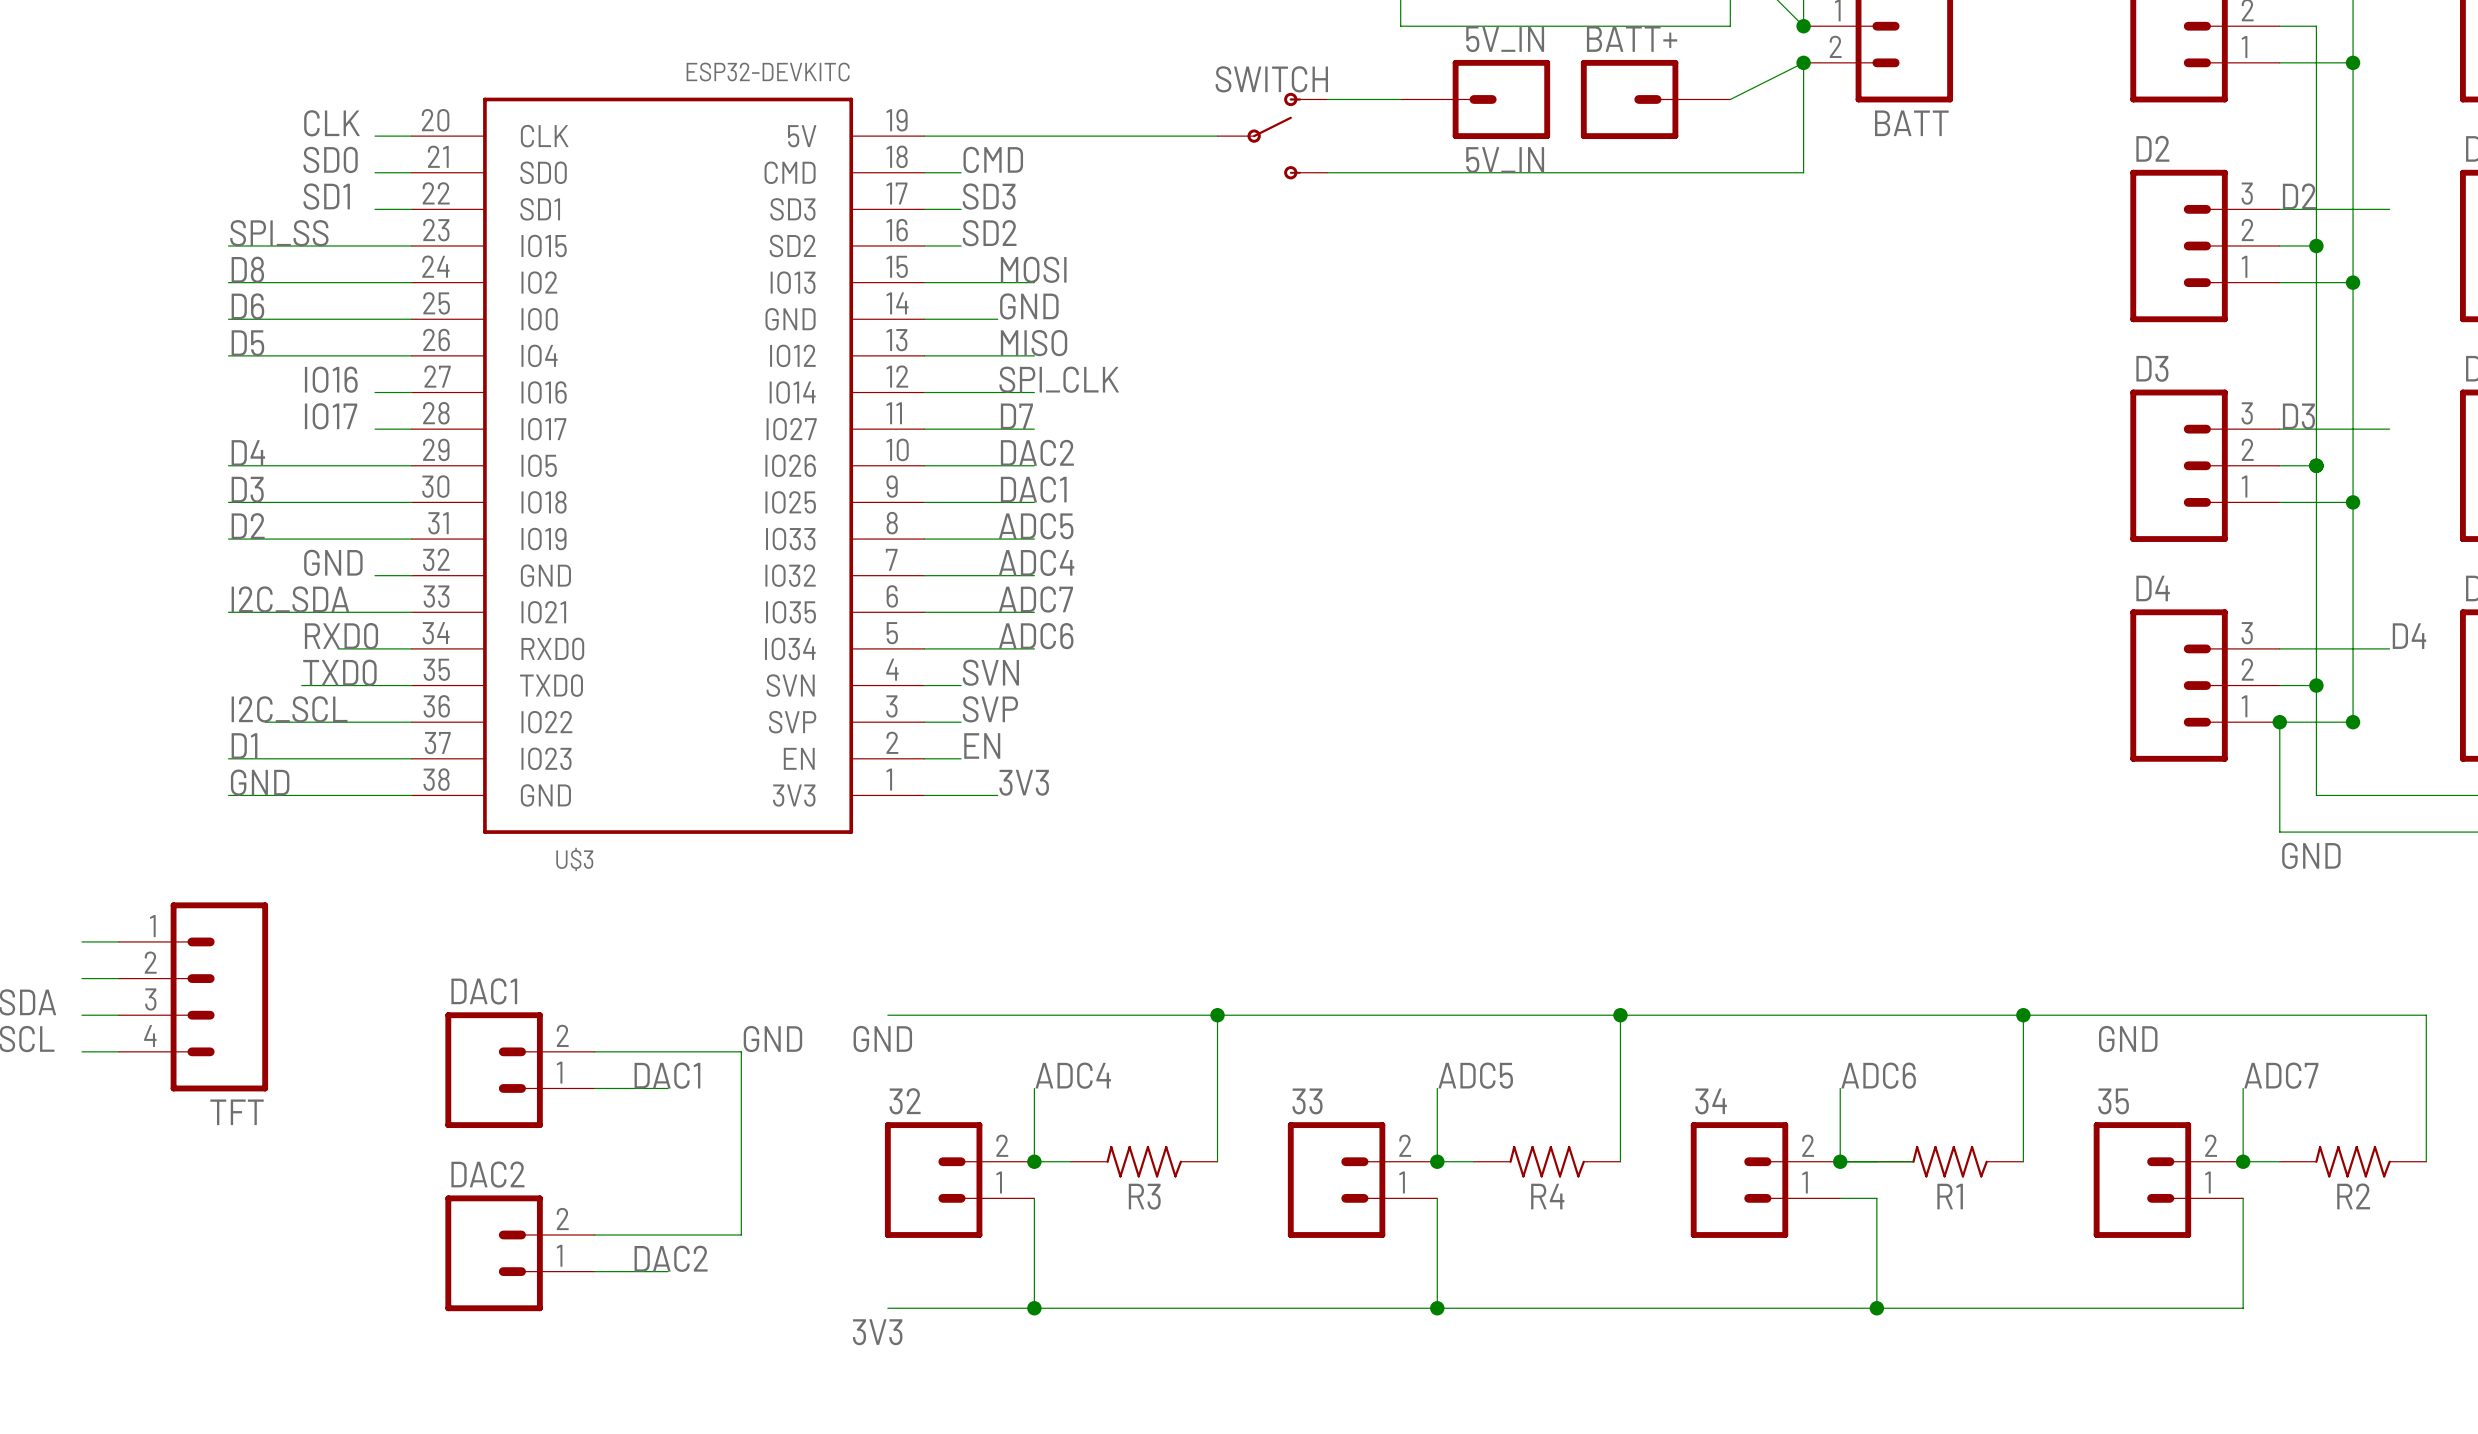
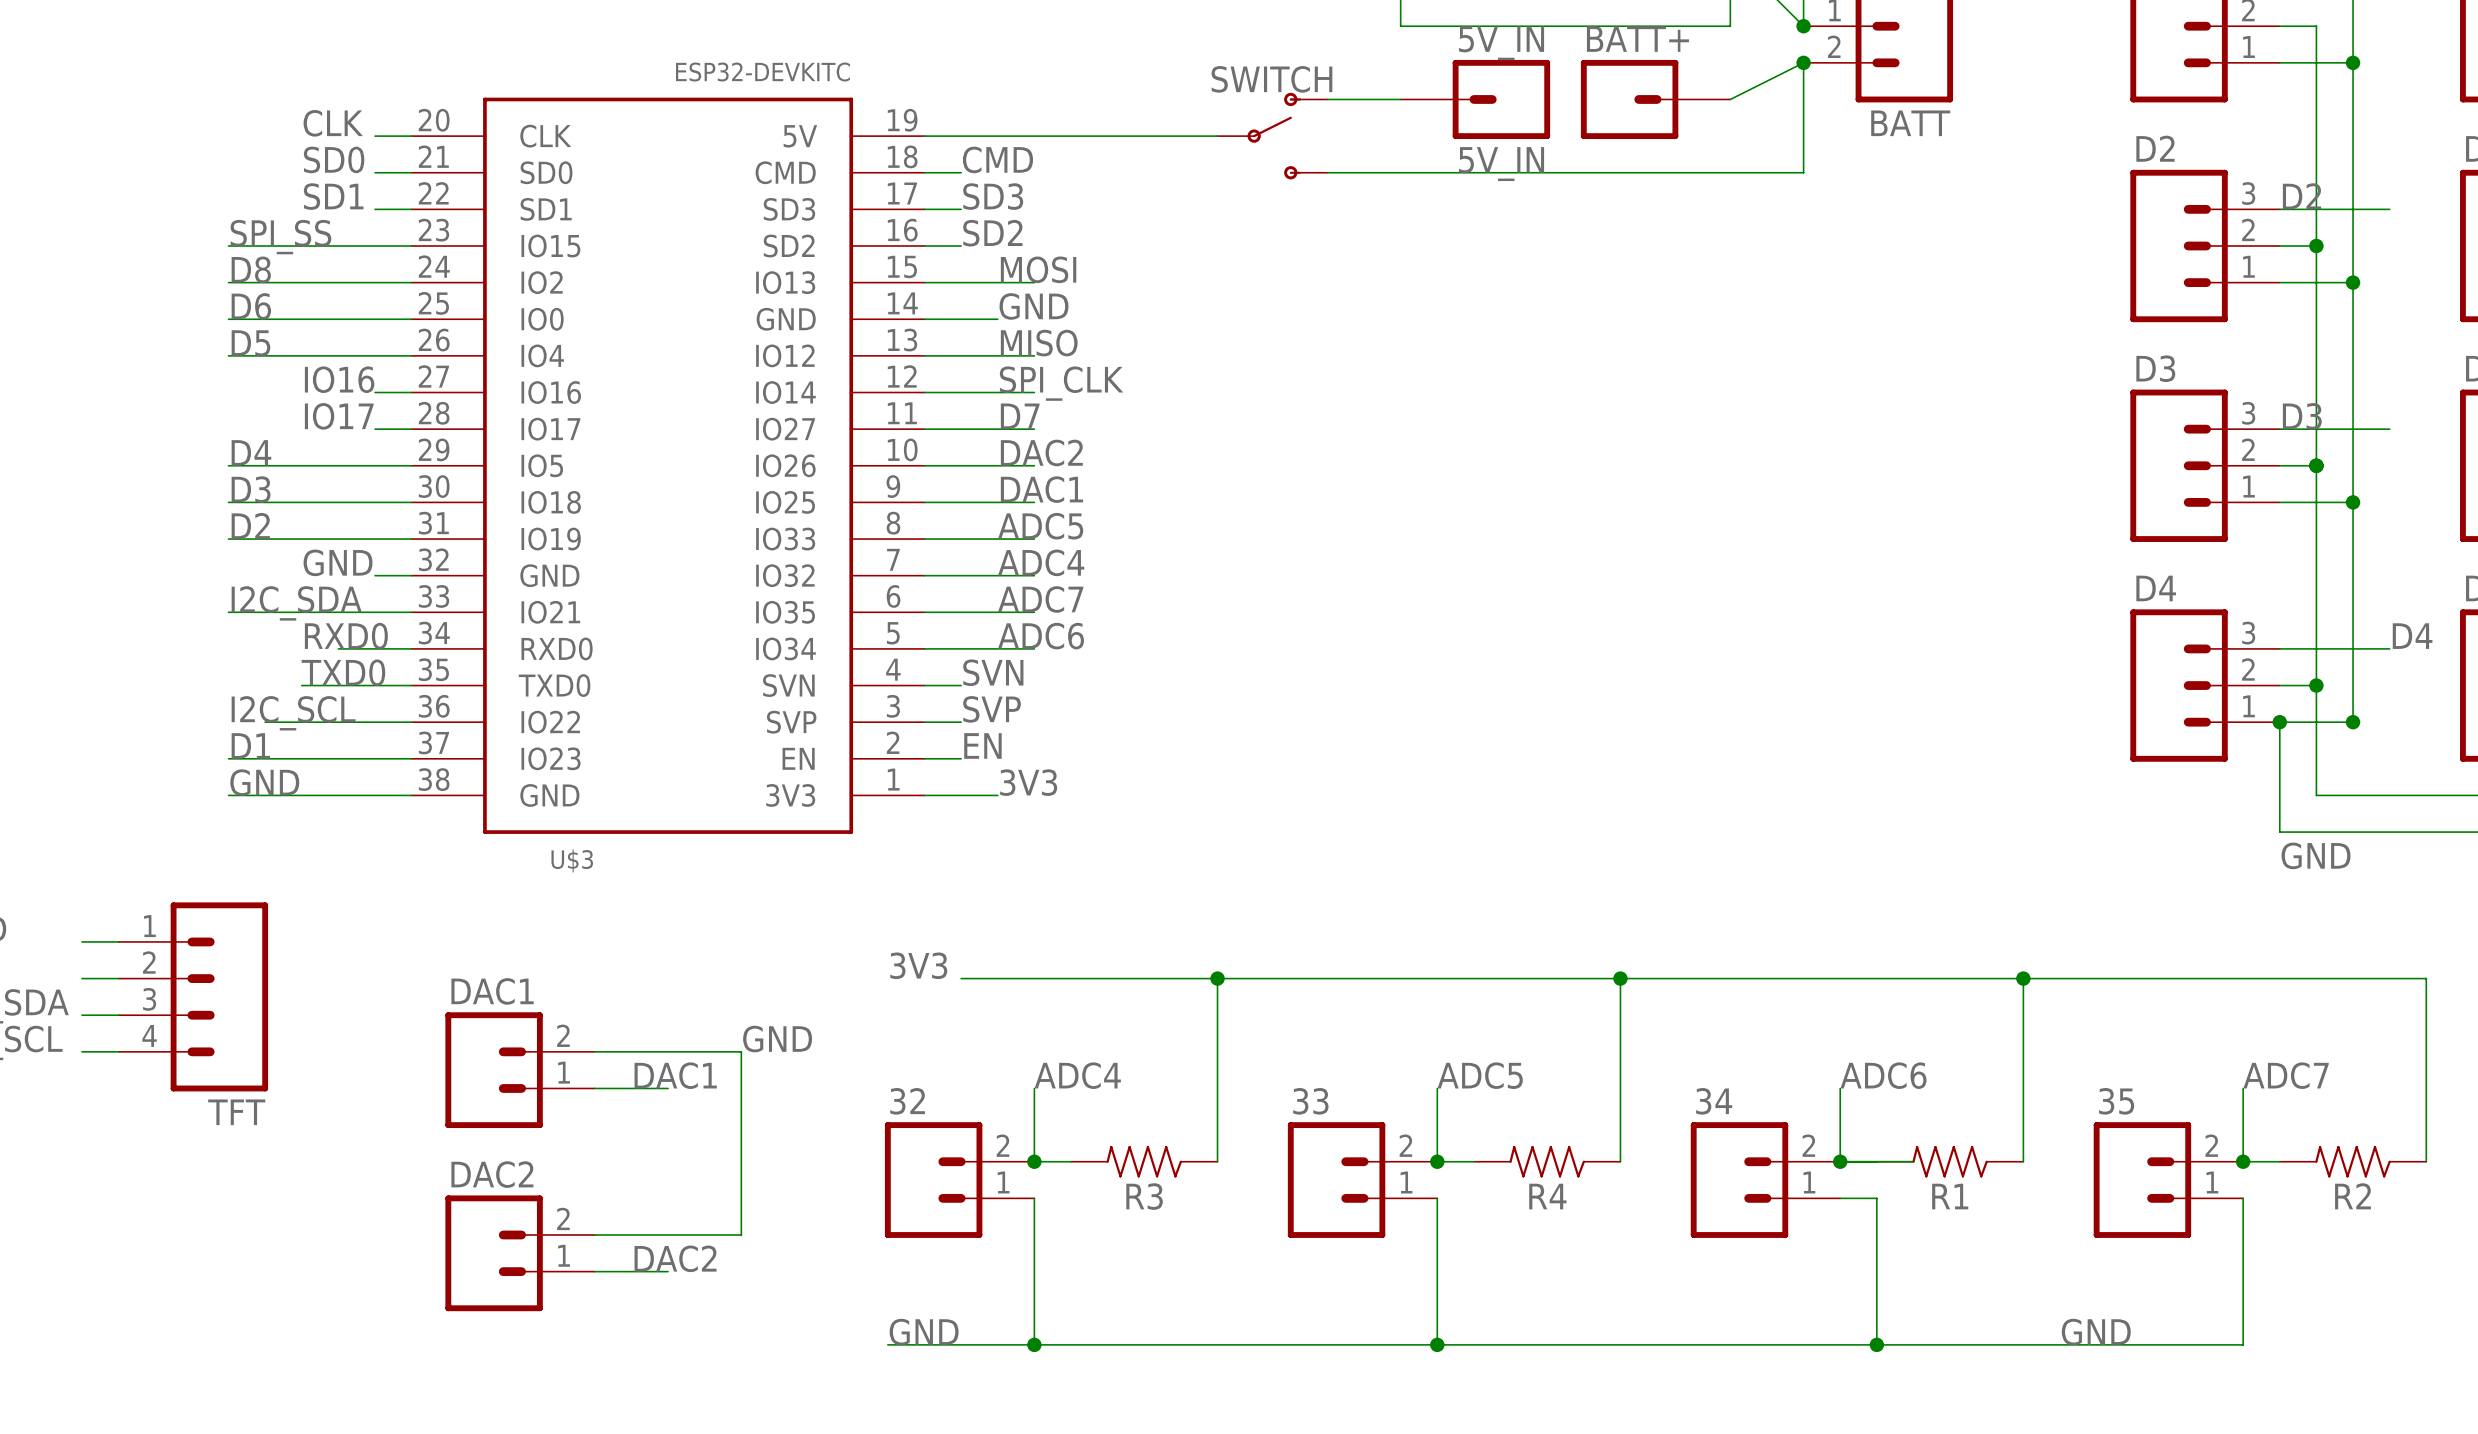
label: none -> 3V3 (918, 965)
wire: none -> (1217, 978) (1217, 1015)
wire: none -> (1620, 978) (1620, 1015)
wire: none -> (2023, 978) (2023, 1015)
wire: (887, 1015) (2426, 1015) -> (961, 978) (2426, 978) (2426, 1015)
junction position: (1217, 1015) -> (1217, 978)
junction position: (1620, 1015) -> (1620, 978)
junction position: (2023, 1015) -> (2023, 978)
label position: GND (882, 1039) -> GND (924, 1332)
label position: GND (2128, 1039) -> GND (2096, 1332)
wire: (887, 1308) (2243, 1308) -> (887, 1344) (2243, 1344) (2243, 1308)
wire: none -> (1034, 1308) (1034, 1344)
junction position: (1034, 1308) -> (1034, 1344)
wire: none -> (1437, 1308) (1437, 1344)
junction position: (1437, 1308) -> (1437, 1344)
wire: none -> (1876, 1308) (1876, 1344)
junction position: (1876, 1308) -> (1876, 1344)
label: 3V3 (877, 1332) -> none

